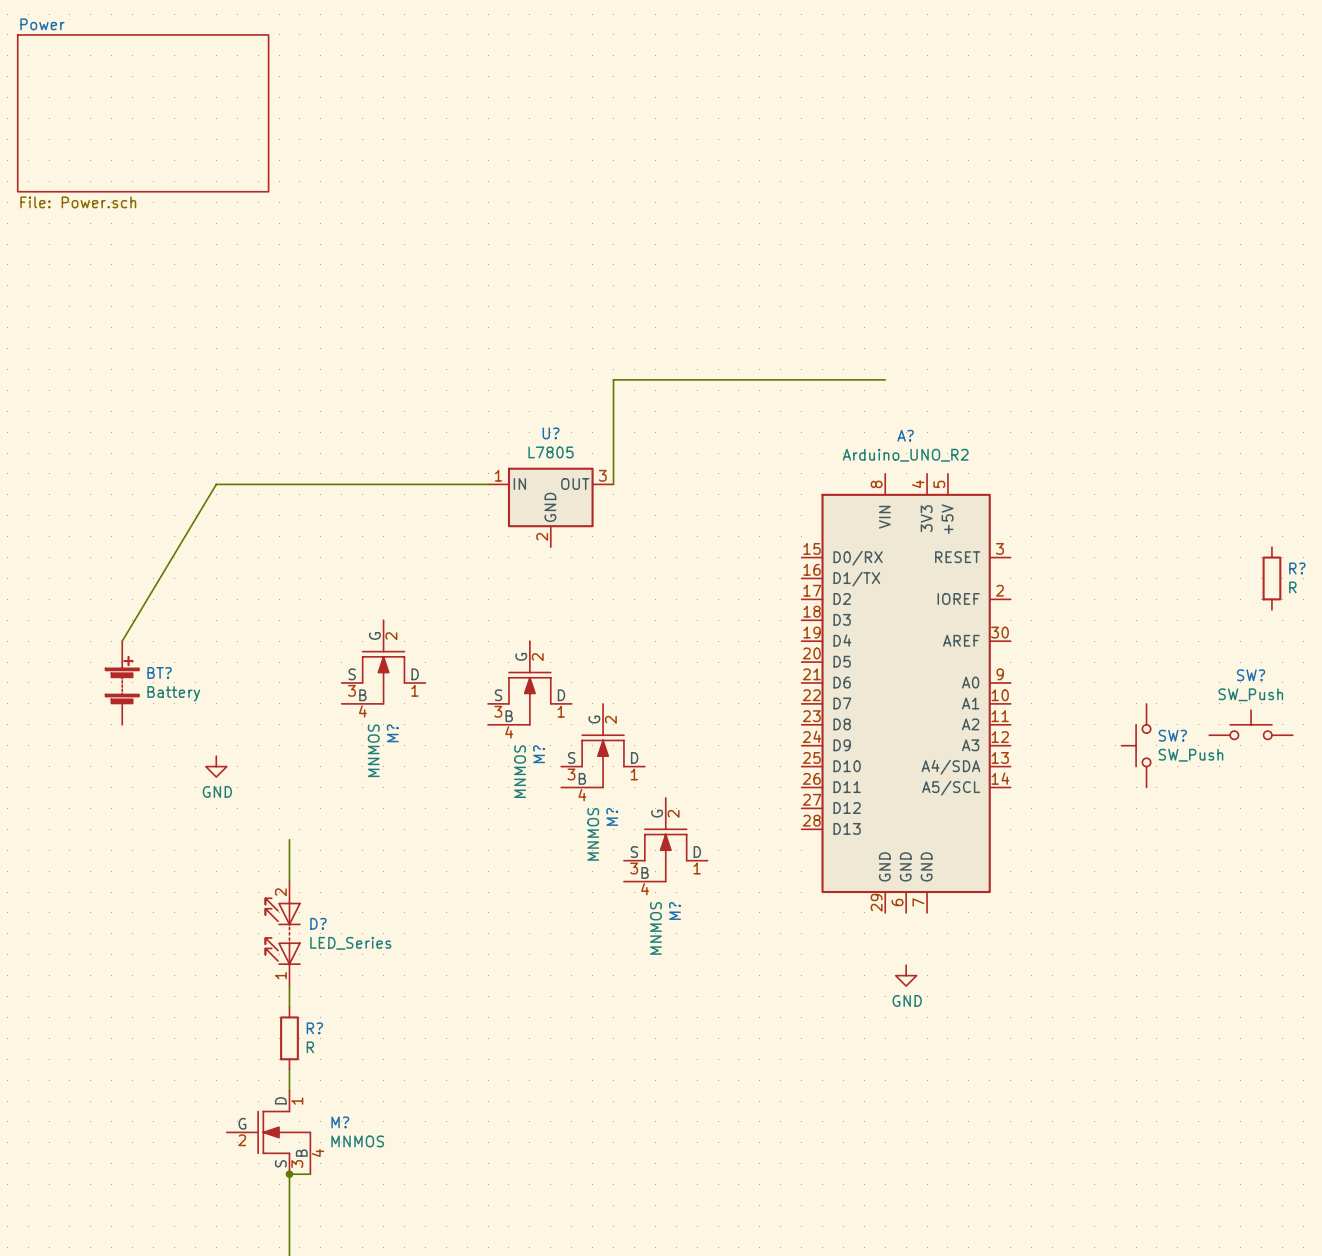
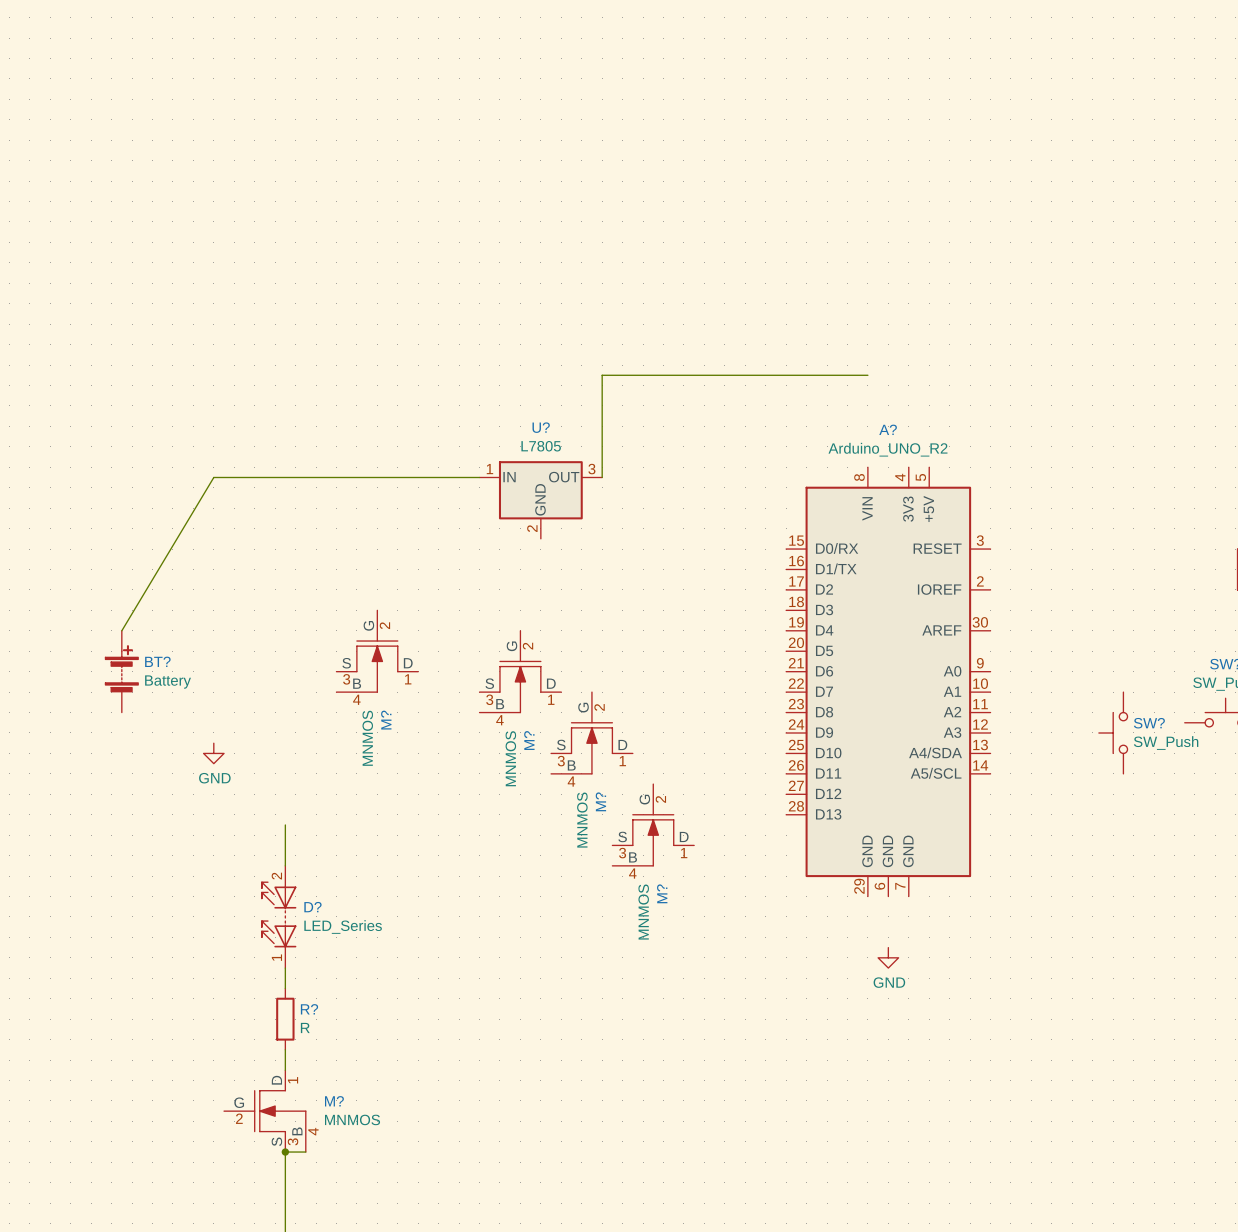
sheet Power: File: Power.sch (143, 113) -> none

